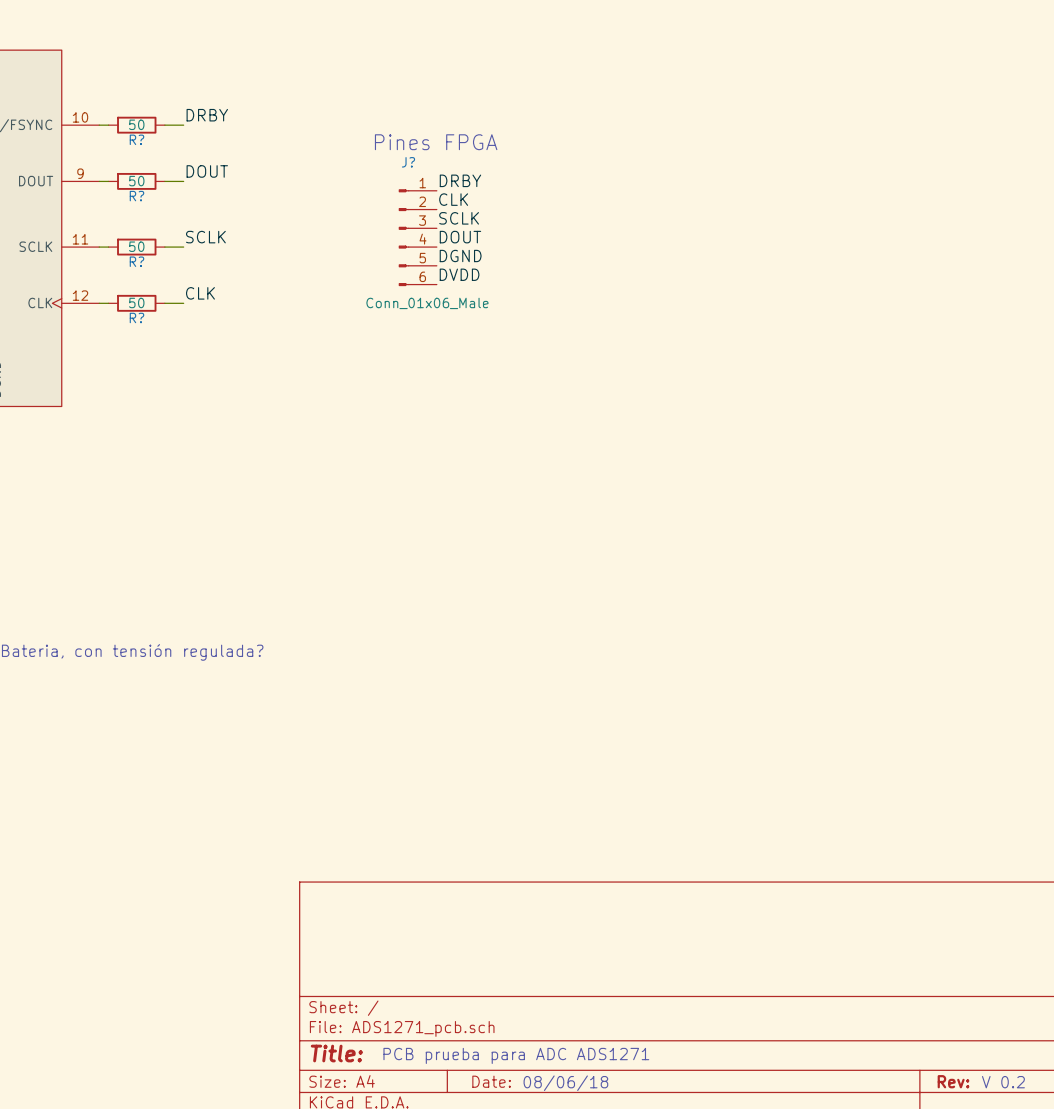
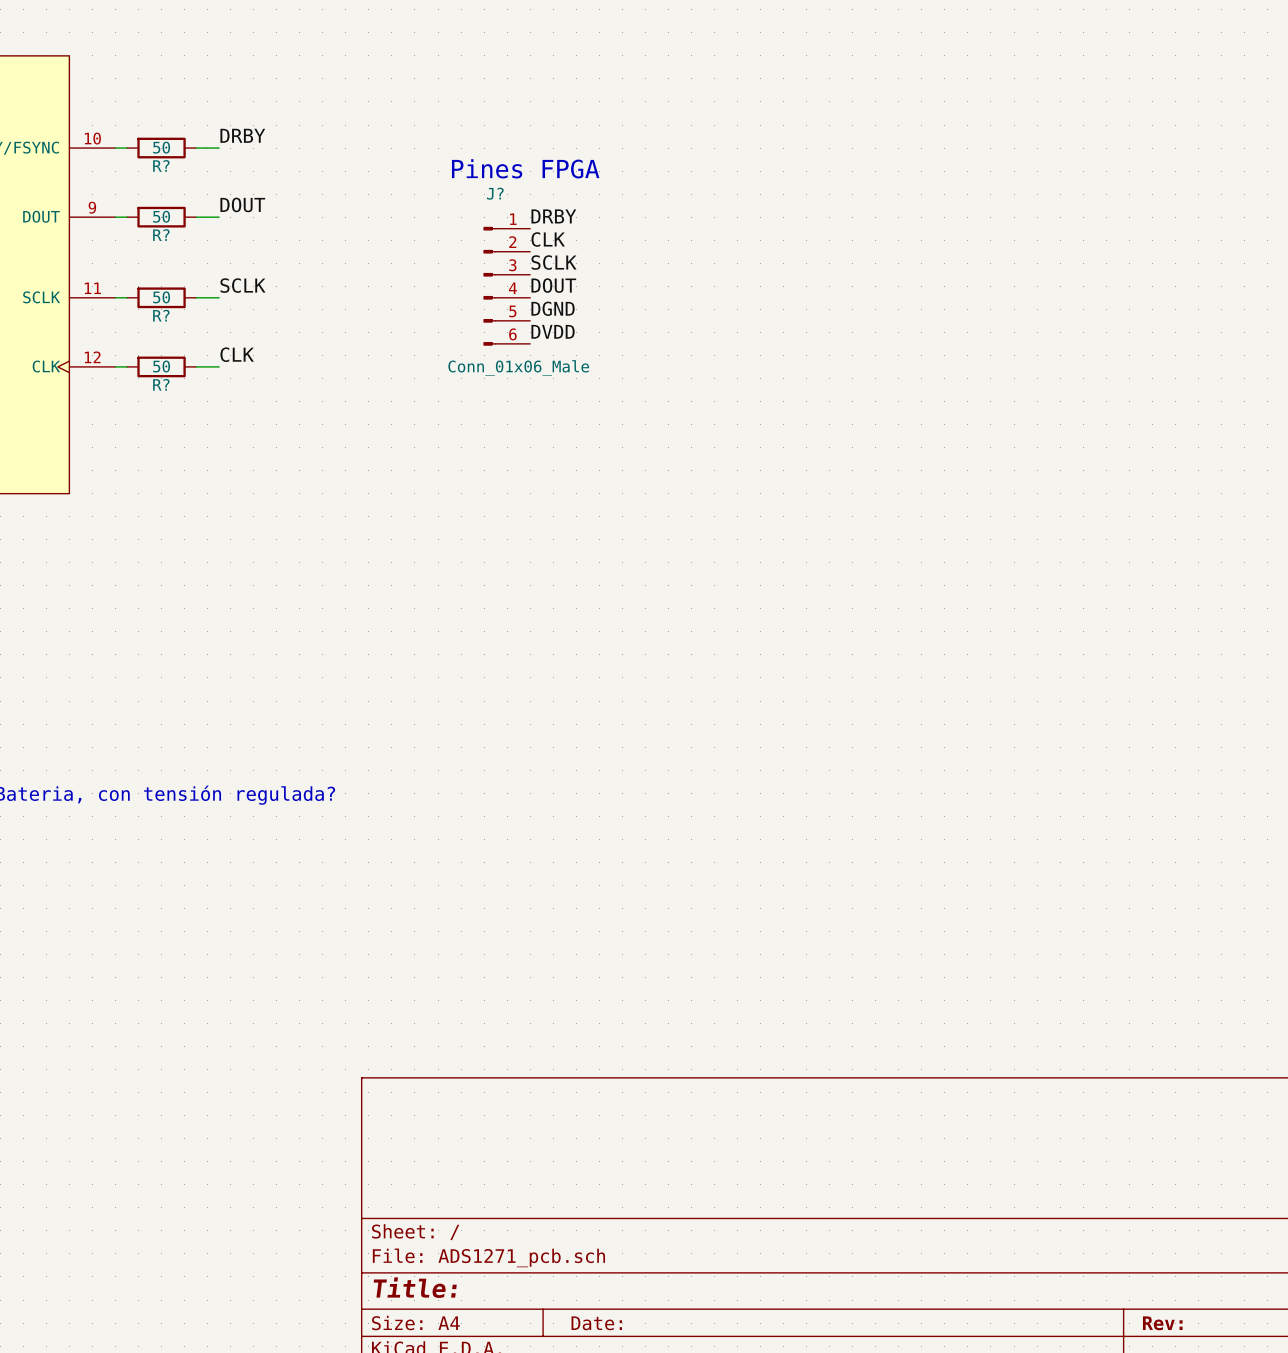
text: PCB prueba para ADC ADS1271 (516, 1055) -> none
text: V 0.2 (1003, 1082) -> none
text: 08/06/18 (565, 1083) -> none

